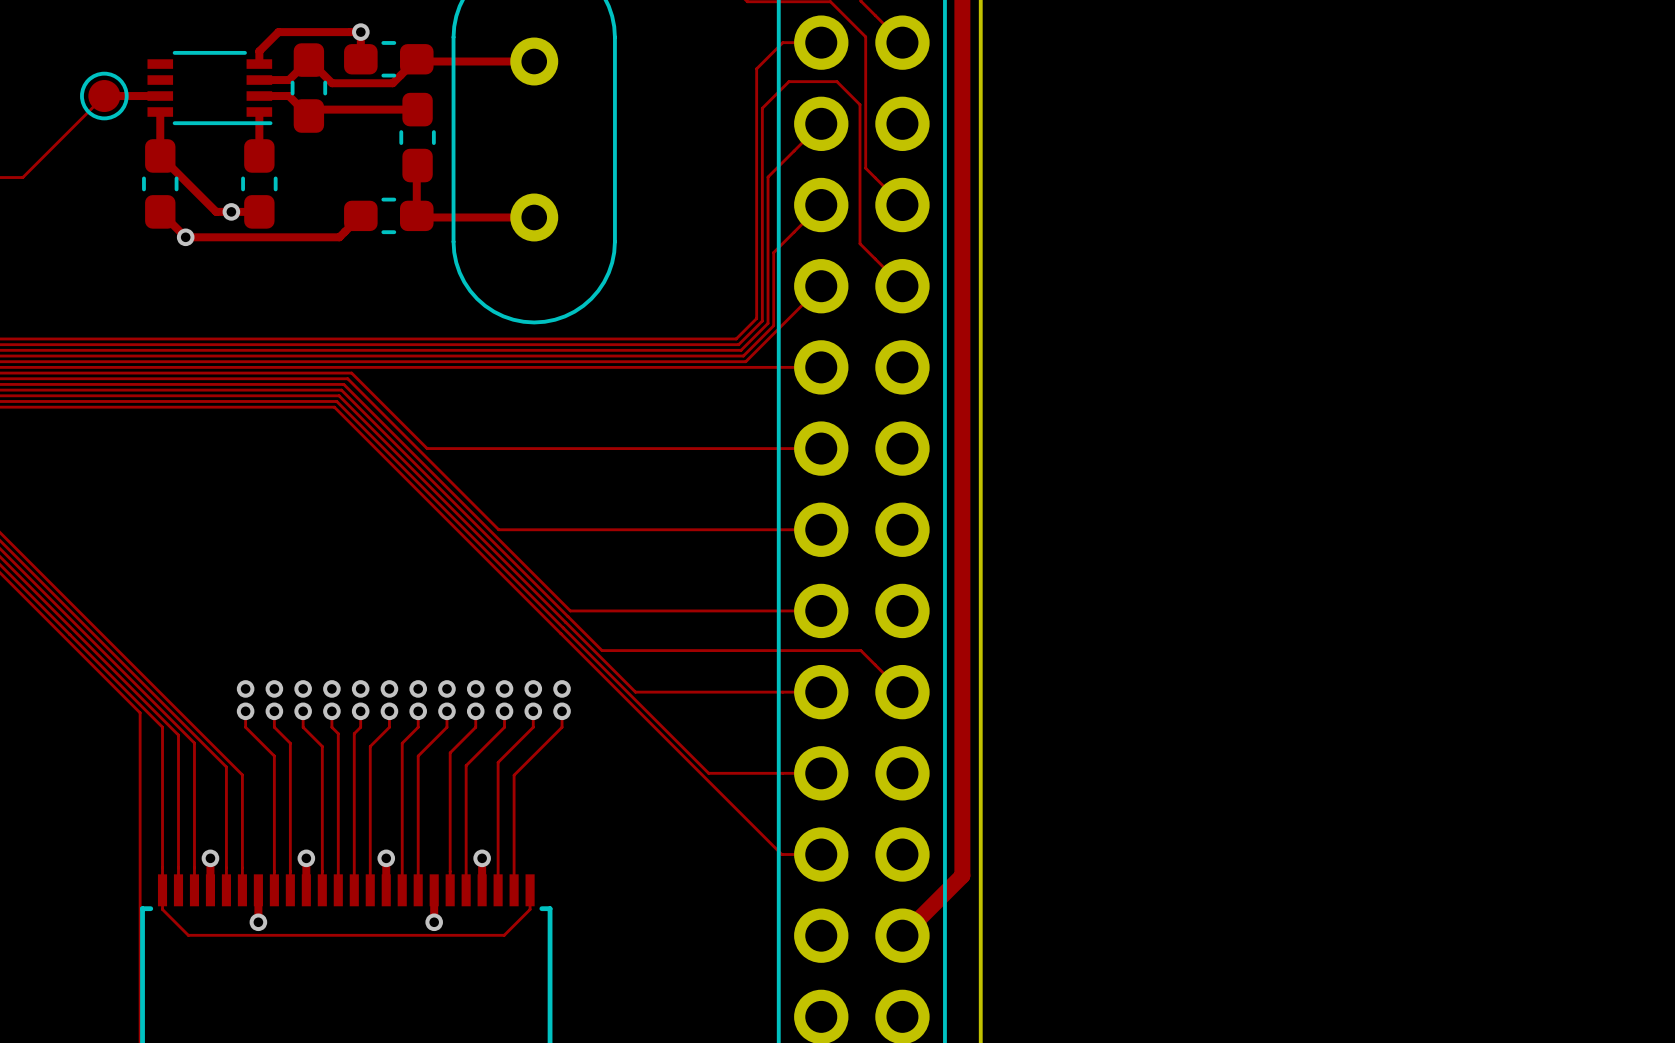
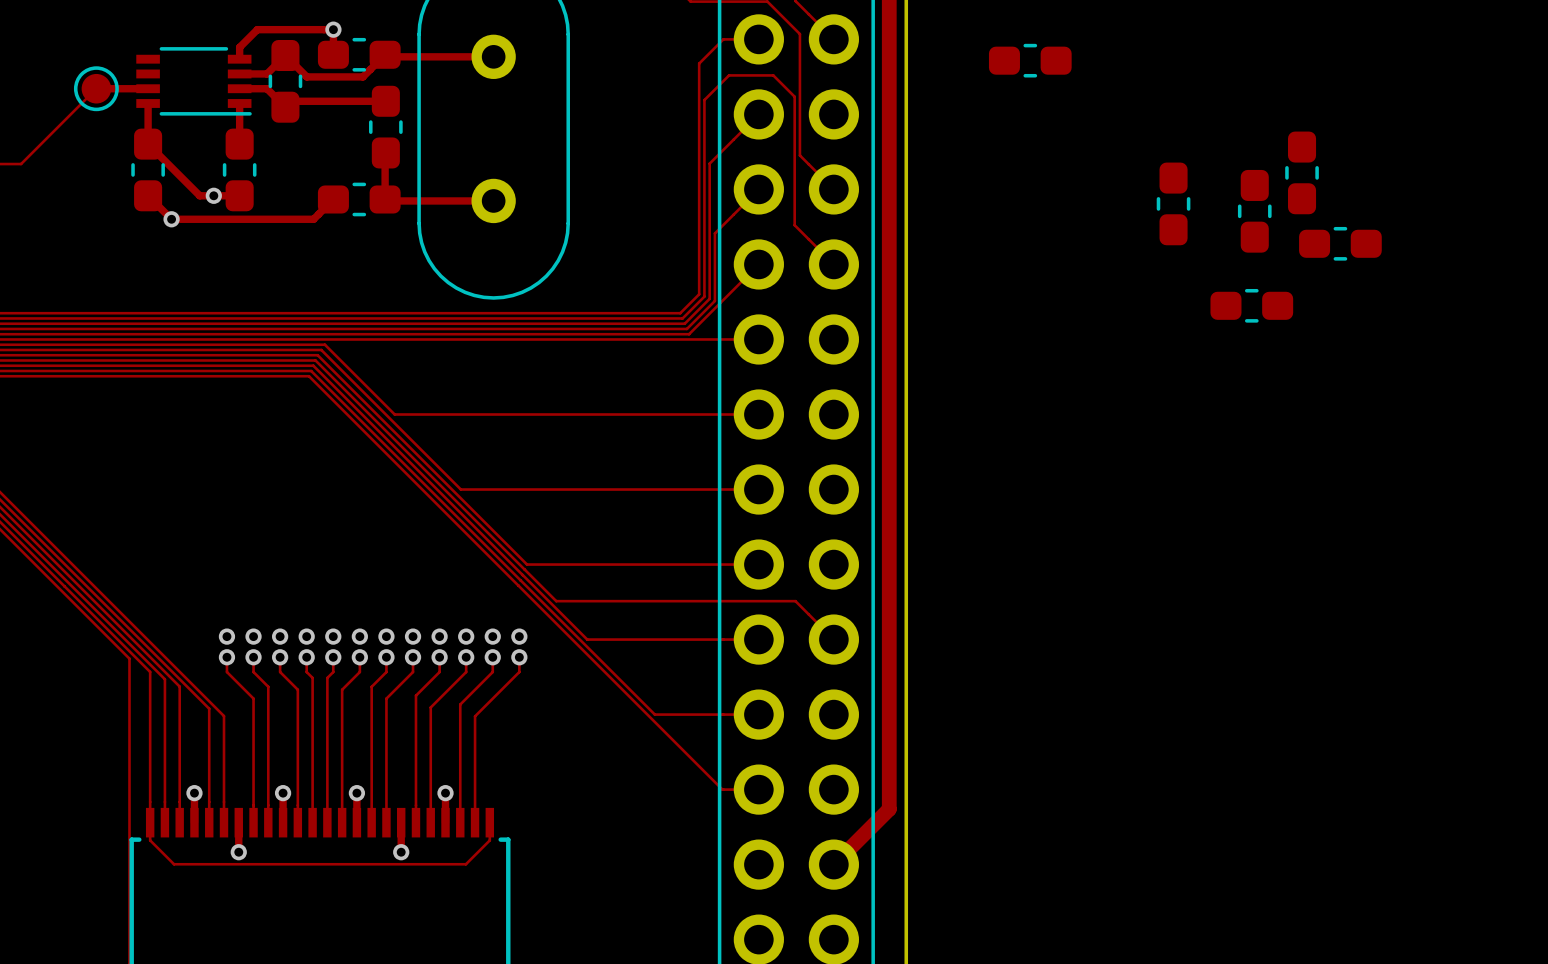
part: none -> (1030, 60)
part: none -> (1302, 172)
part: none -> (1173, 203)
part: none -> (1254, 211)
part: none -> (1340, 243)
part: none -> (1251, 305)

